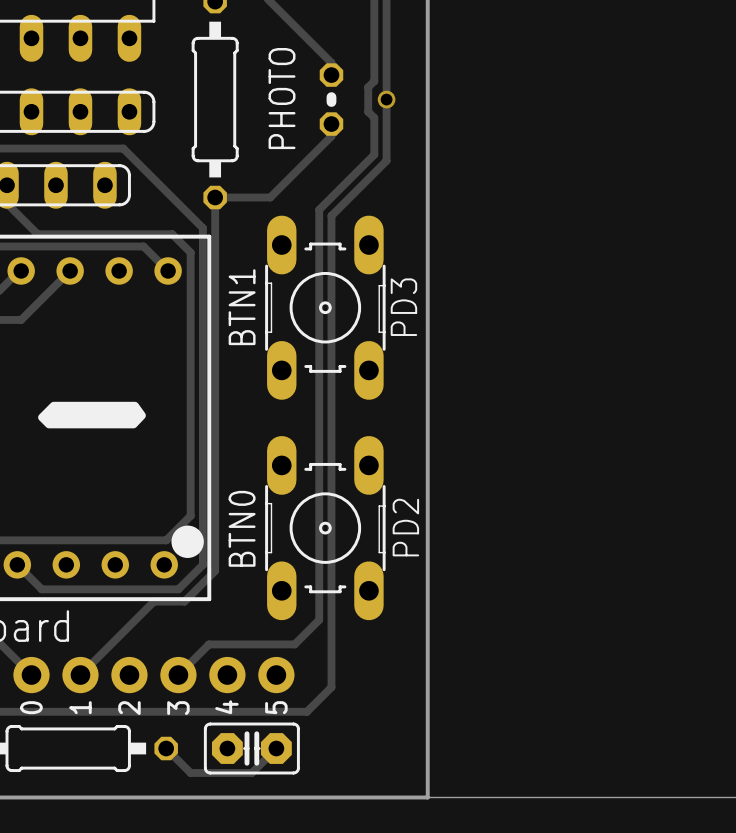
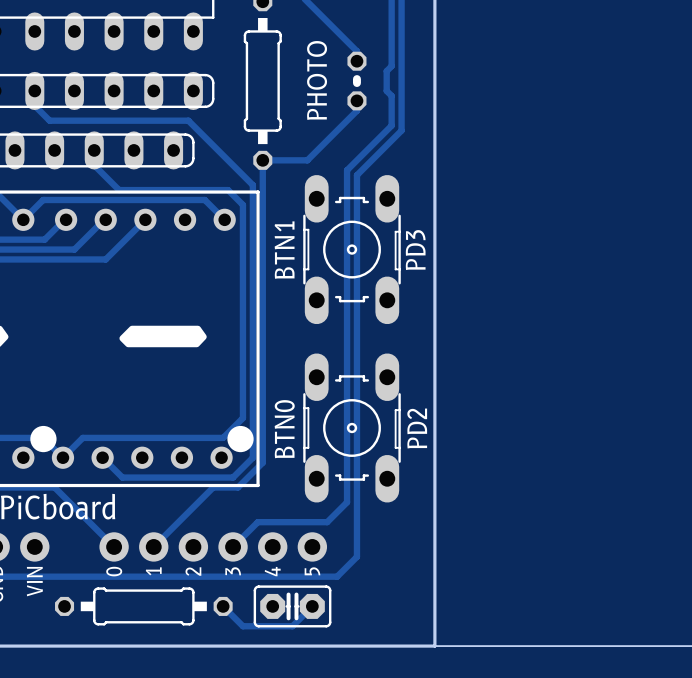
via: (386, 99) -> none

